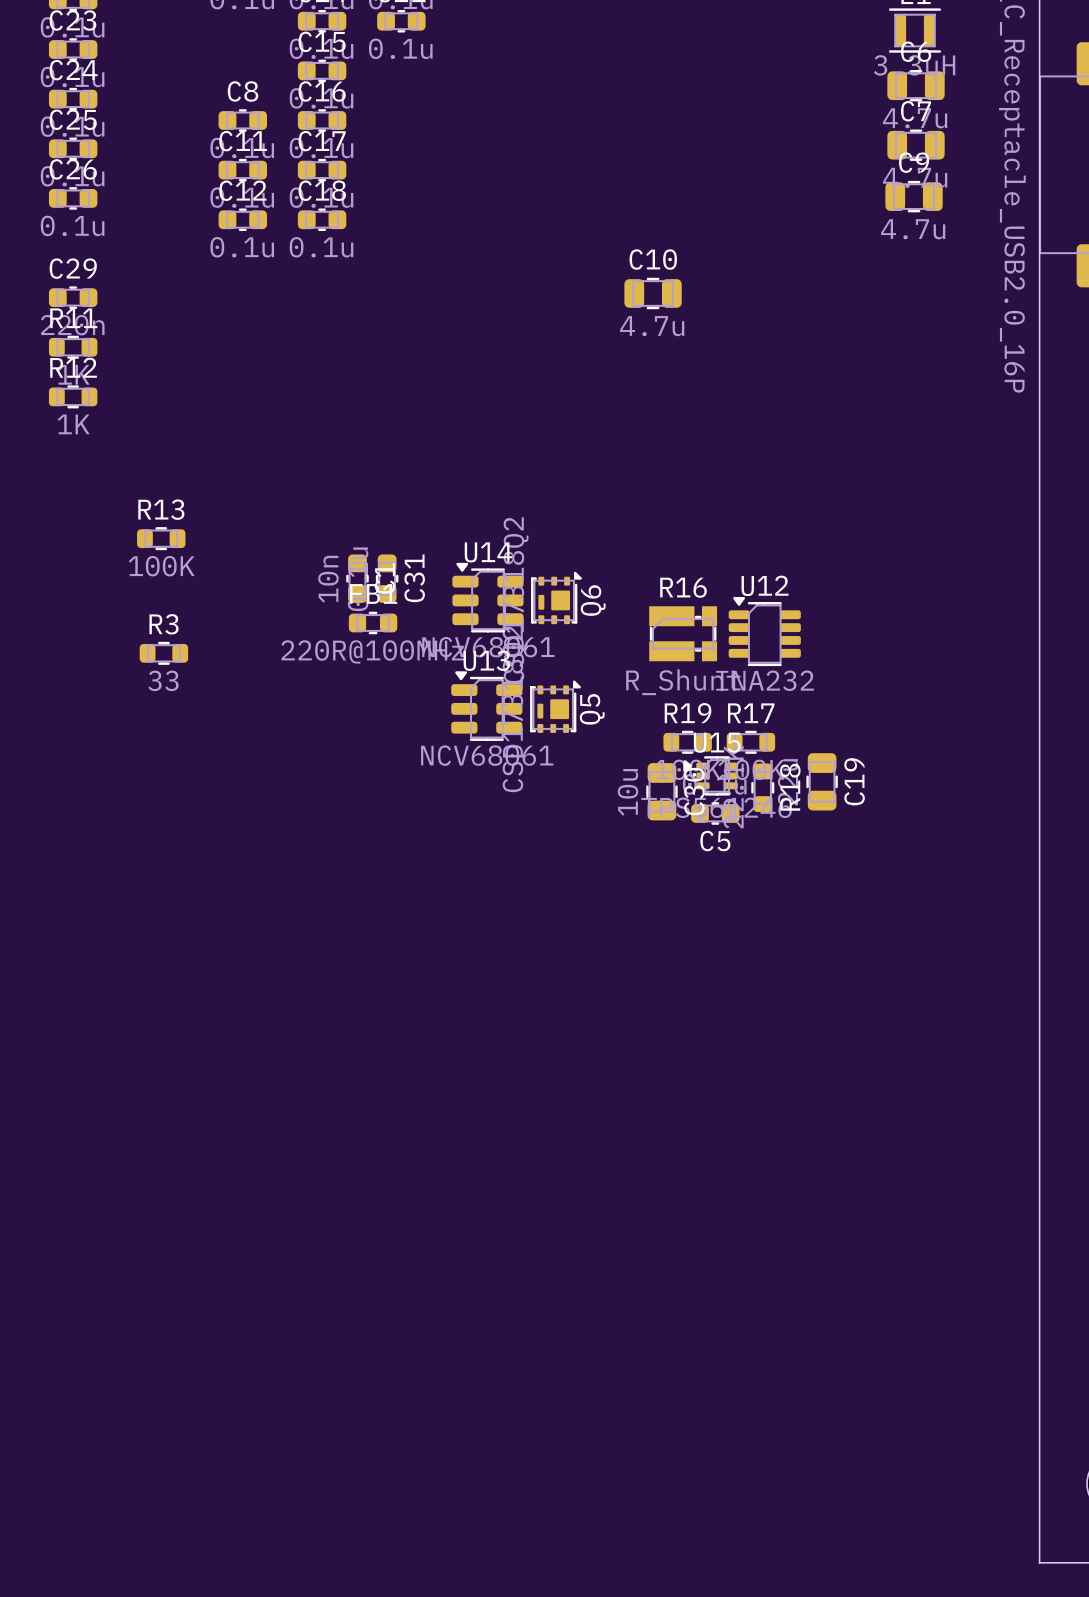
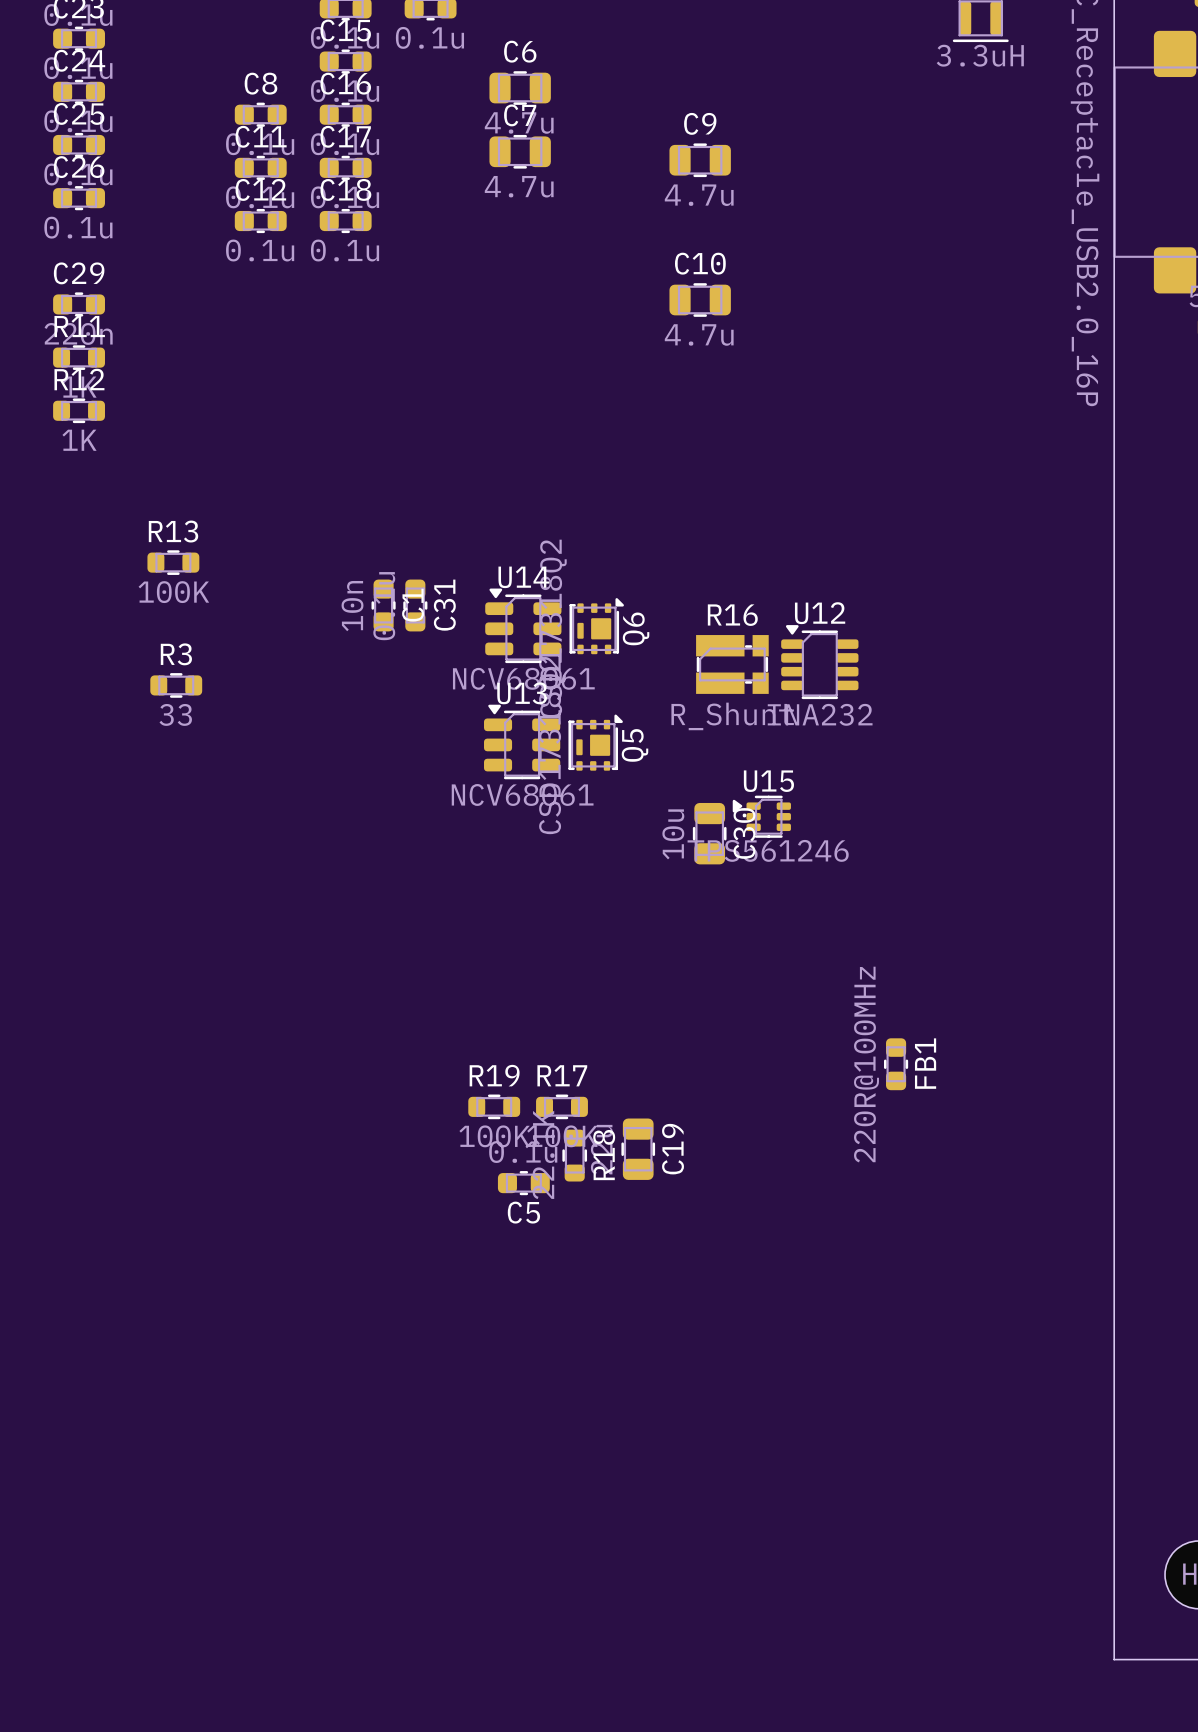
C6 position: (916, 85) -> (520, 88)
C7 position: (916, 145) -> (520, 151)
C9 position: (914, 196) -> (700, 160)
FB1 rotation: 0° (373, 622) -> 90° clockwise (896, 1064)
FB1 position: (373, 622) -> (896, 1064)
R19 position: (687, 742) -> (494, 1106)
R17 position: (750, 742) -> (561, 1106)
C19 position: (822, 781) -> (638, 1149)
R18 position: (762, 787) -> (574, 1155)
C5 position: (715, 813) -> (523, 1183)

